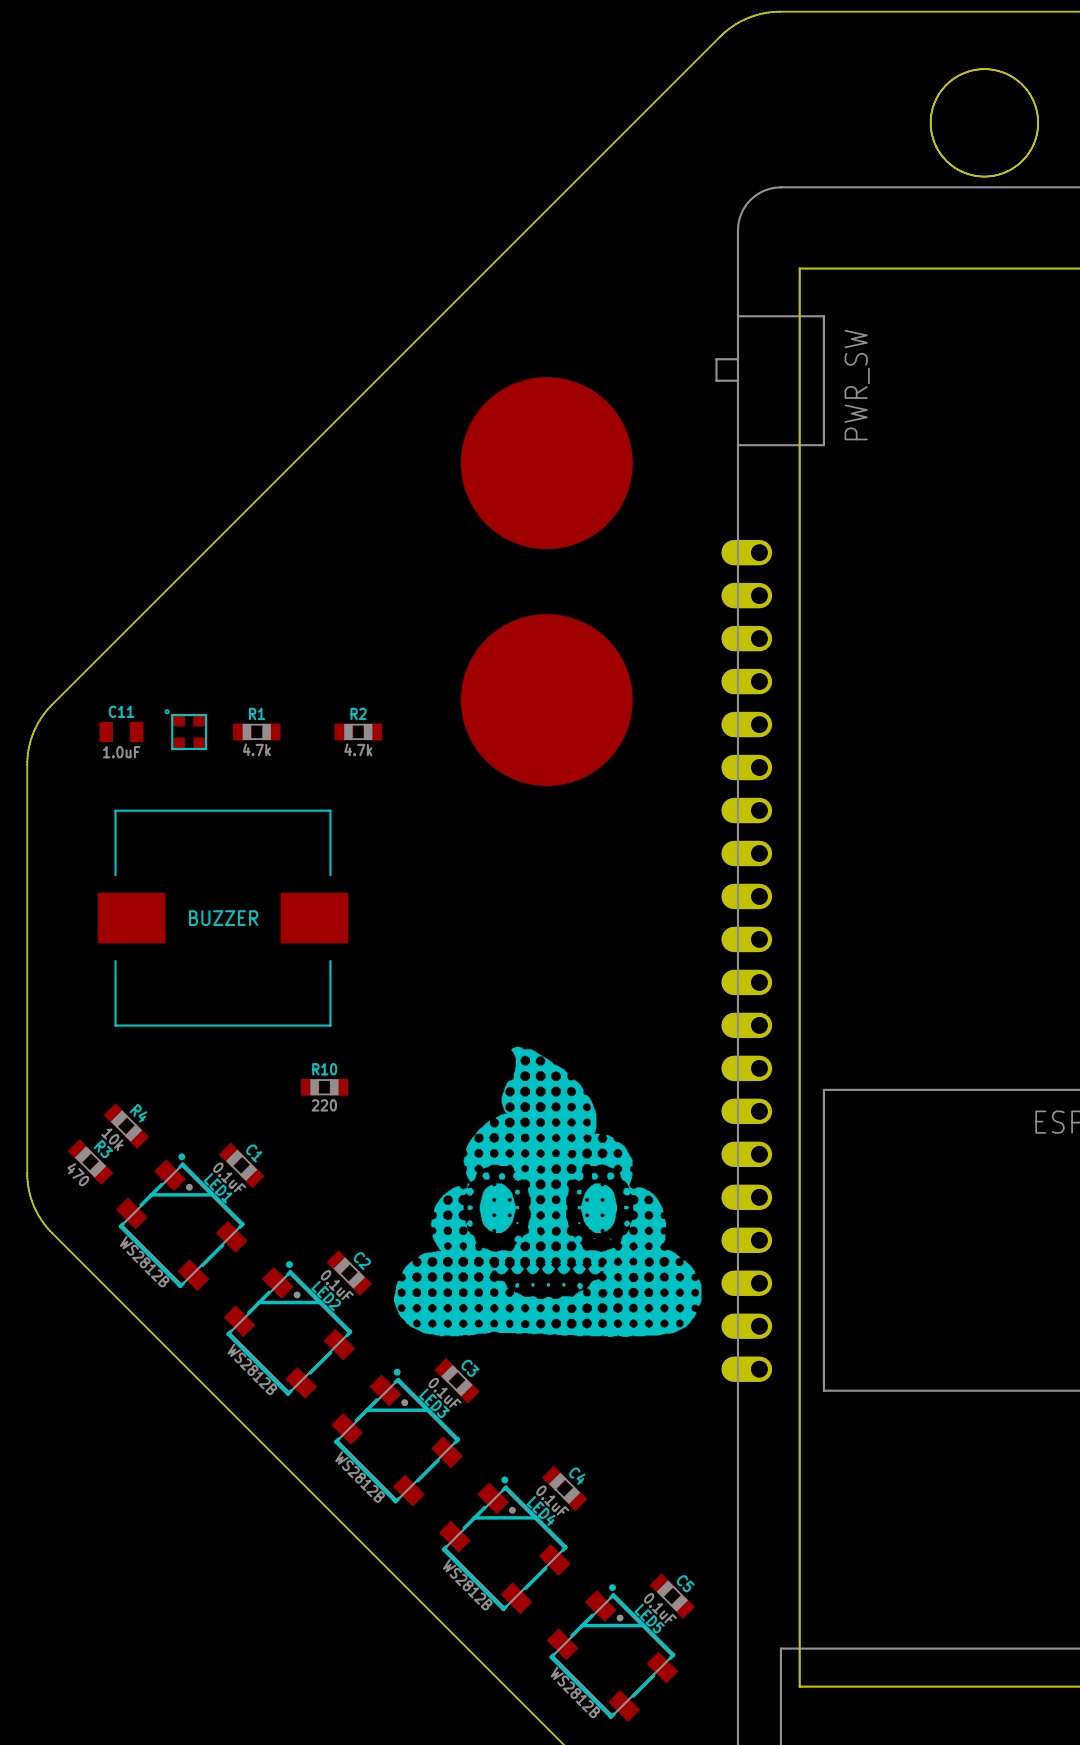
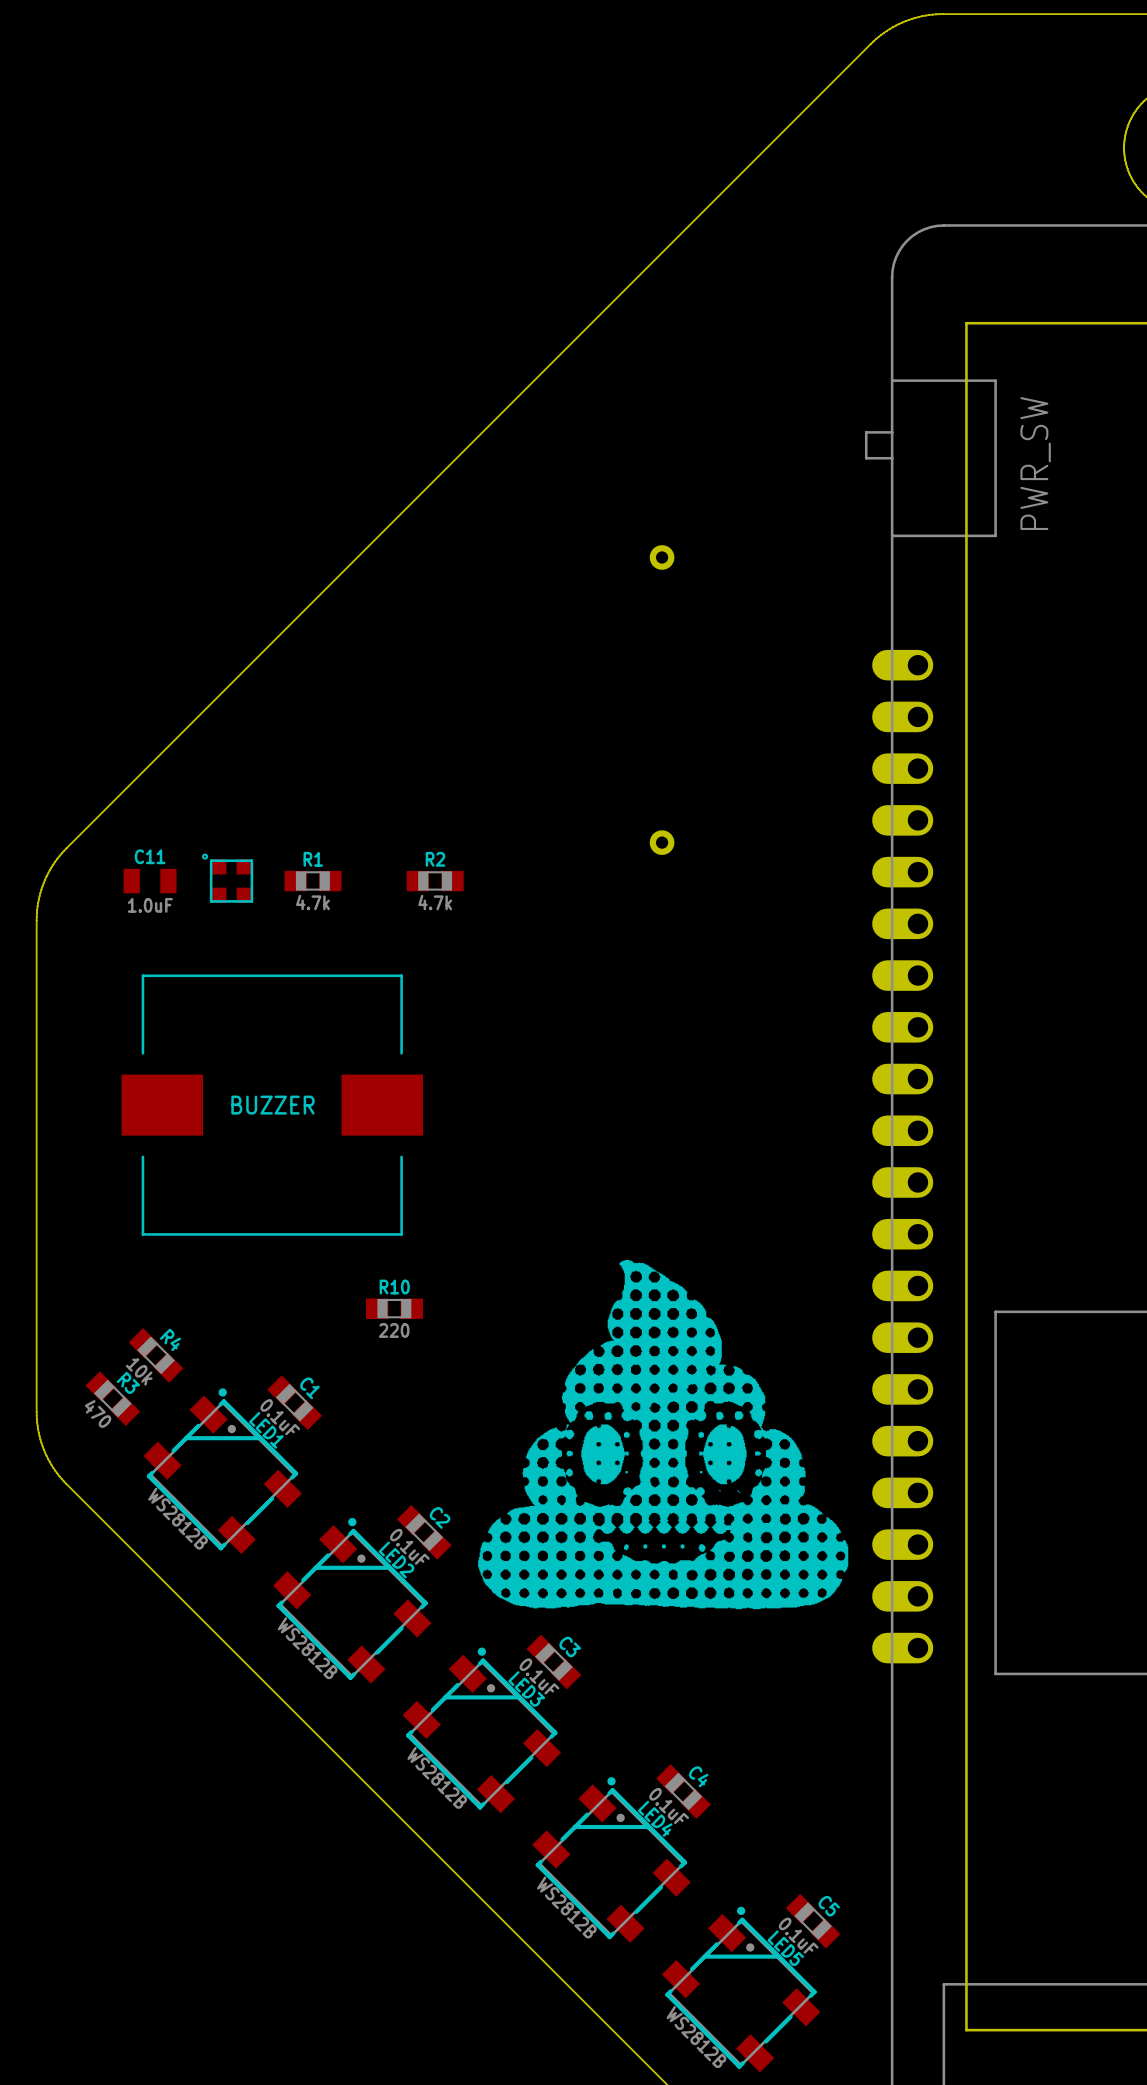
part footprint: [460, 377, 633, 550] -> [649, 545, 675, 570]
part footprint: [460, 614, 633, 787] -> [649, 830, 675, 855]

